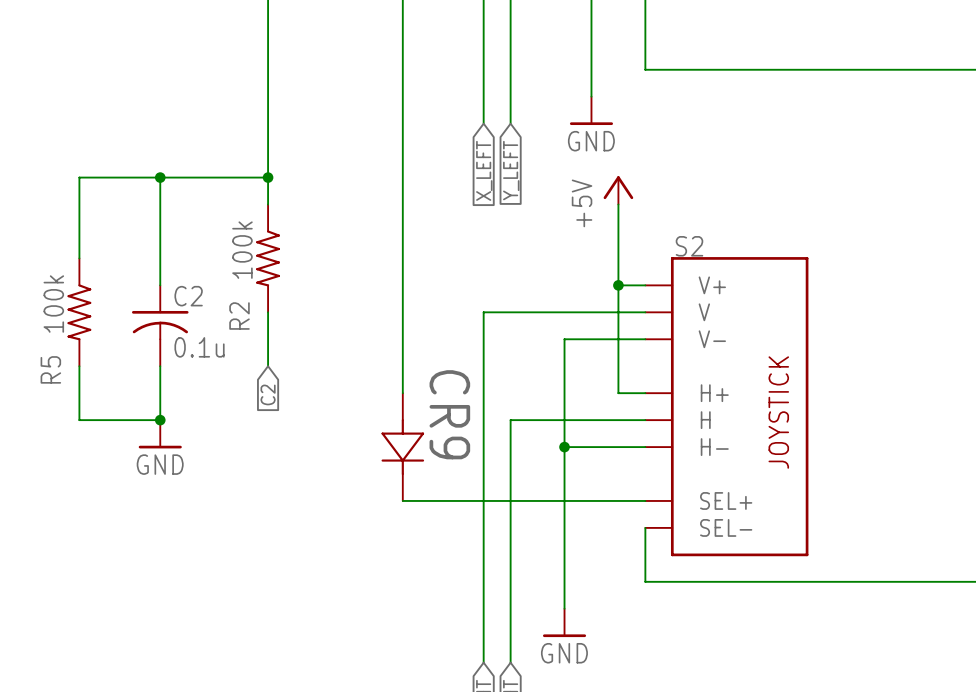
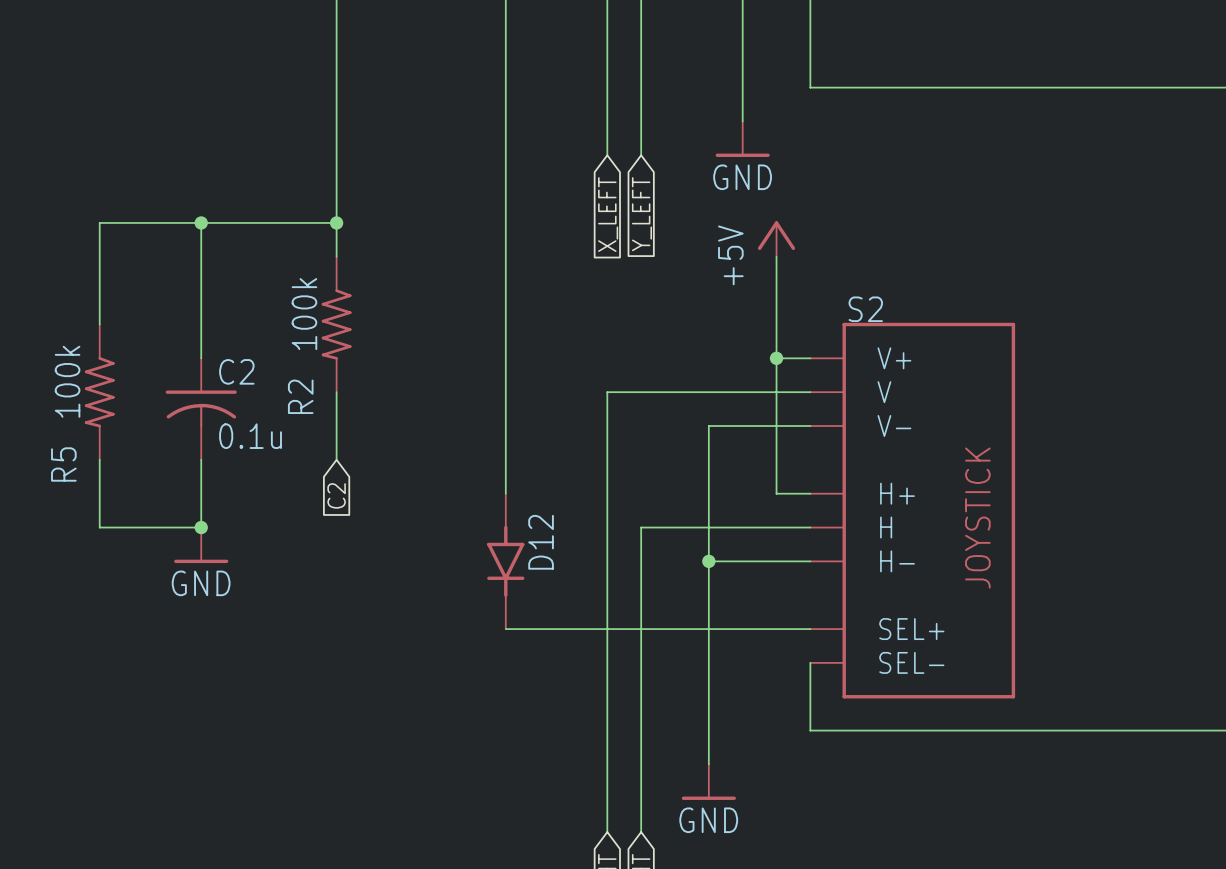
CR9: (402, 447) -> none
D12: none -> (505, 561)

